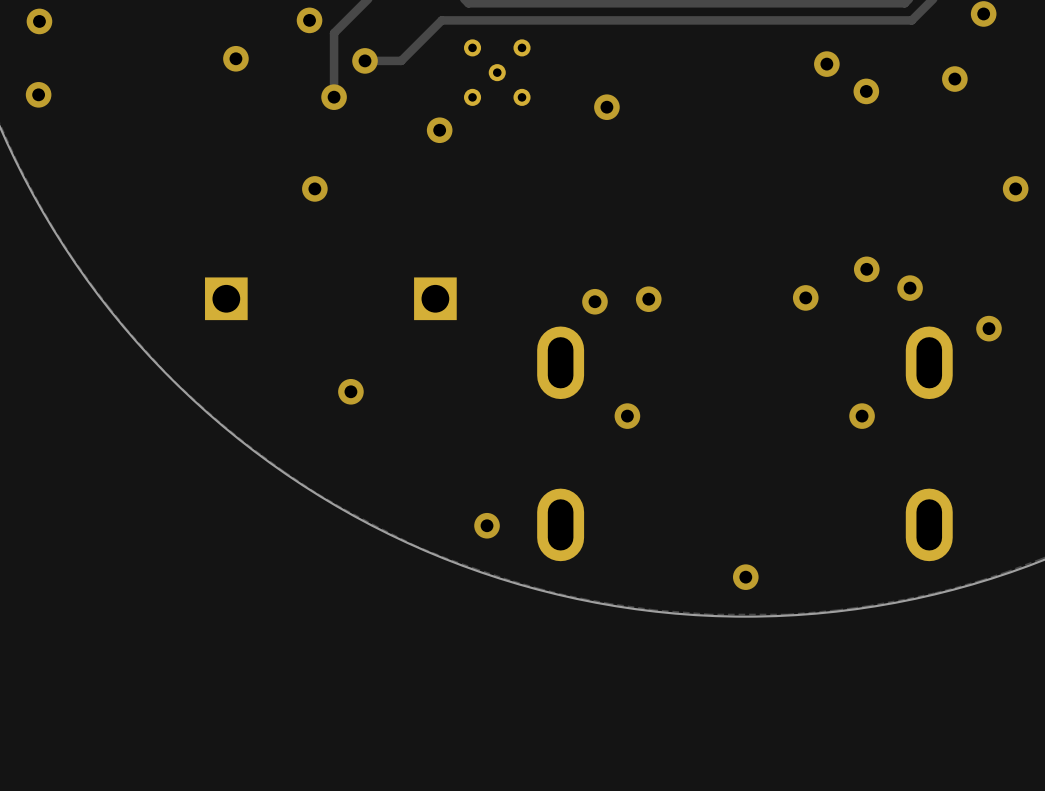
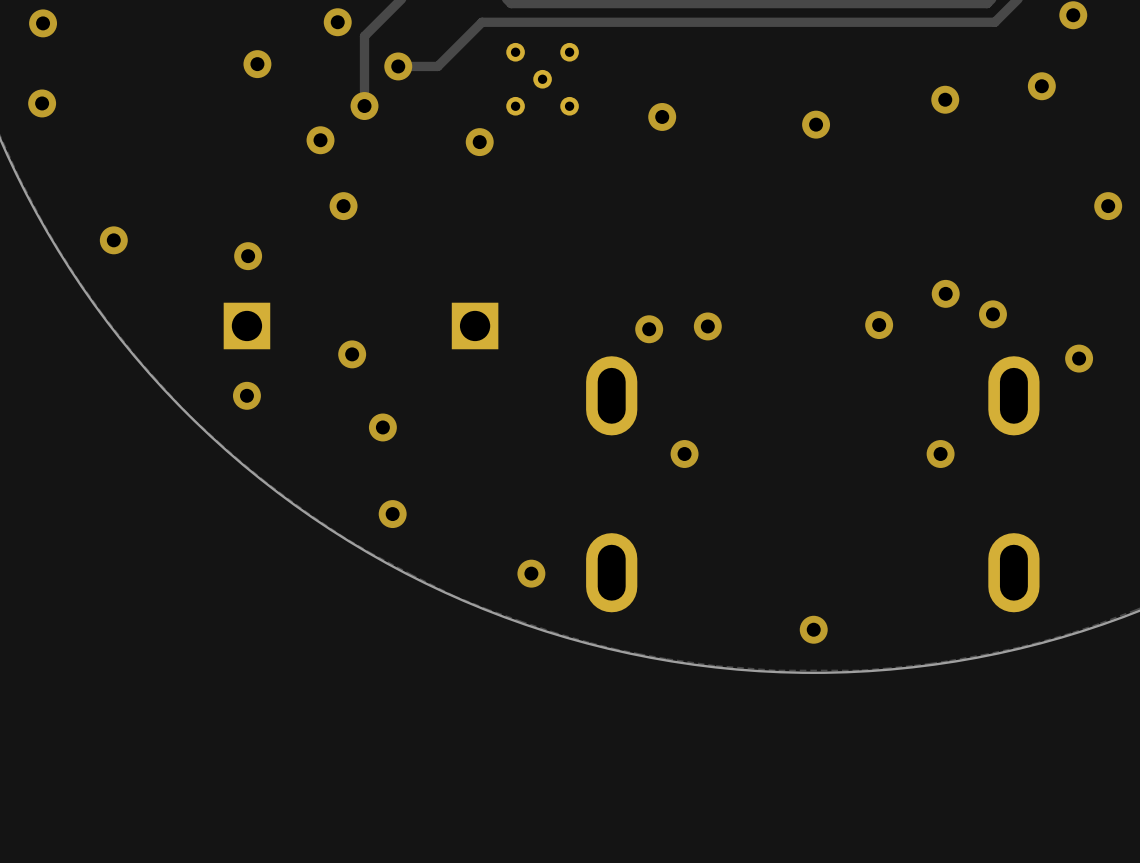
via position: (826, 64) -> (816, 124)
via: none -> (320, 140)
via: none -> (113, 240)
via: none -> (248, 256)
via: none -> (352, 354)
via: none -> (246, 395)
via: none -> (392, 514)

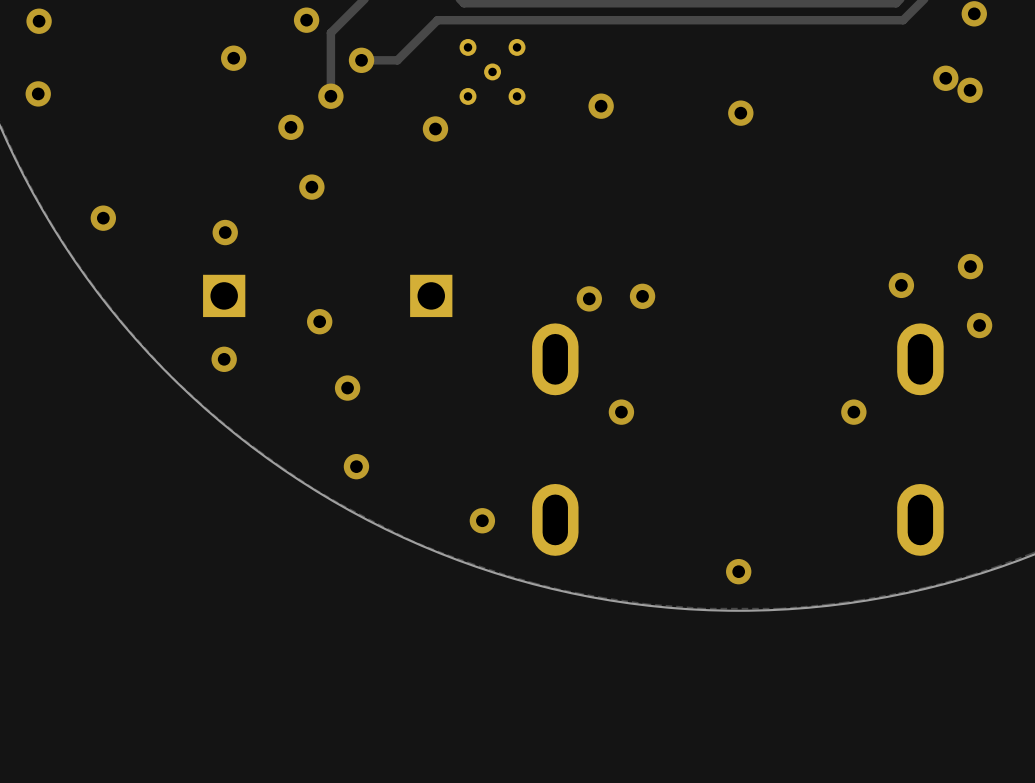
via: (945, 99) -> none
via: none -> (970, 90)
via: (1108, 206) -> none
via: (945, 293) -> none
via: none -> (970, 266)
via: (879, 325) -> none

